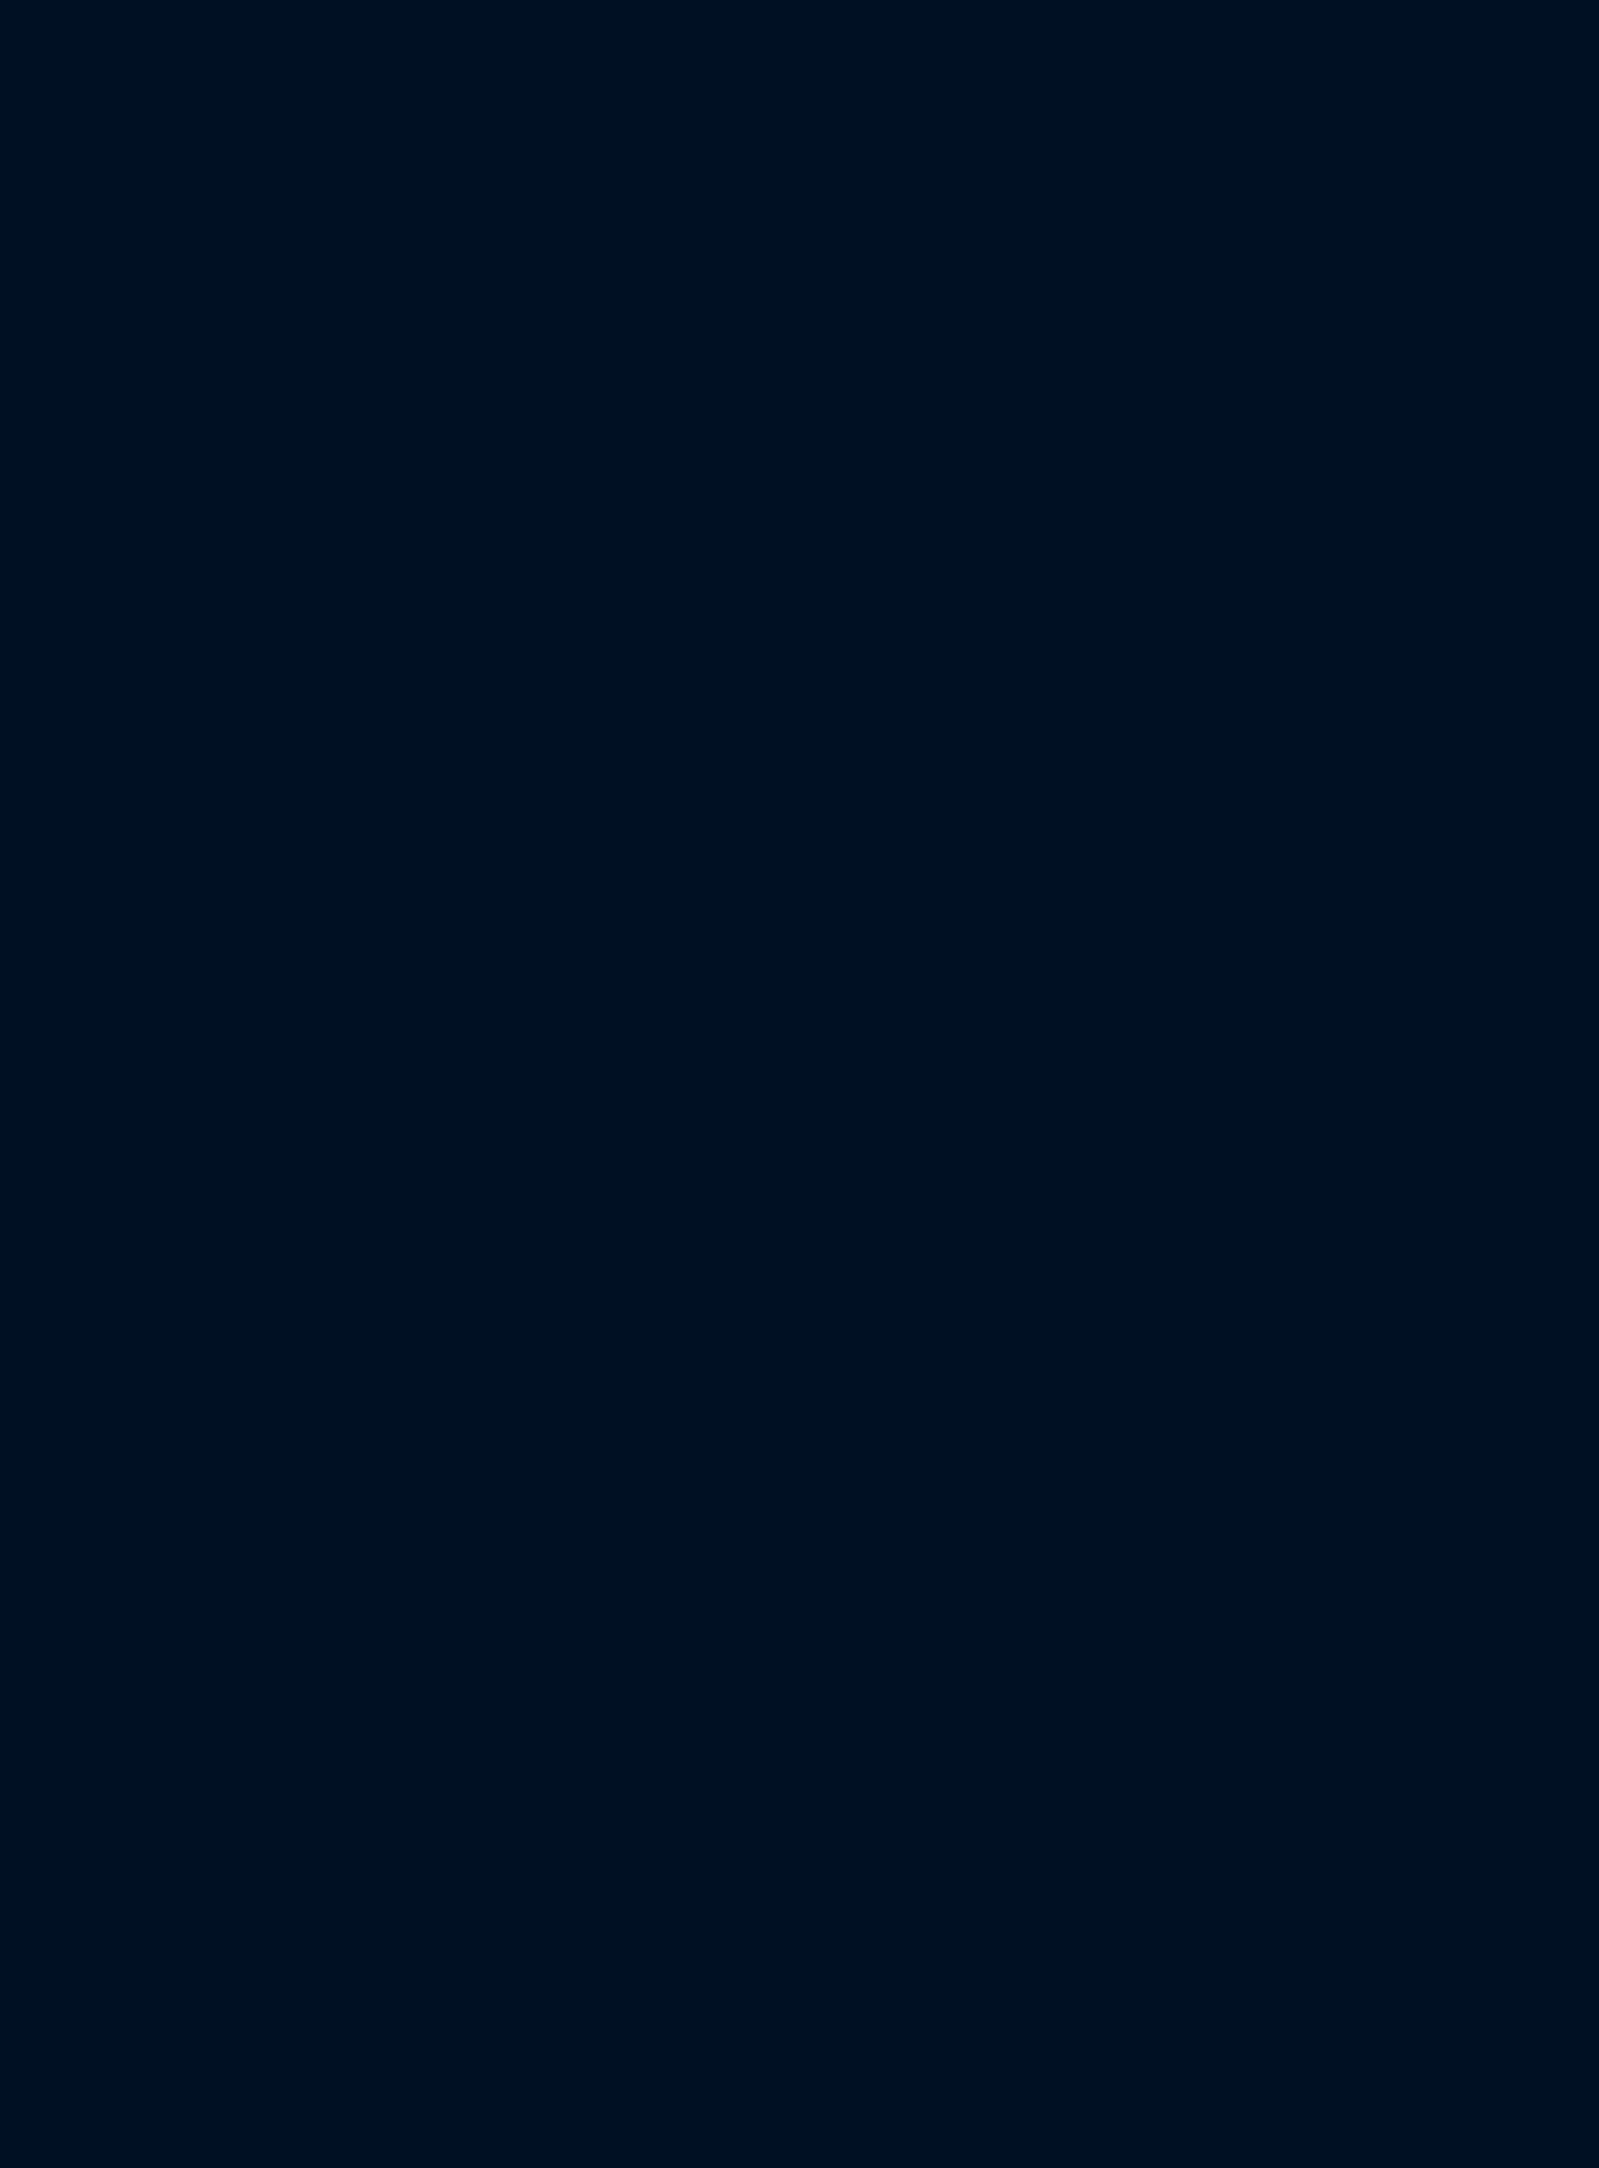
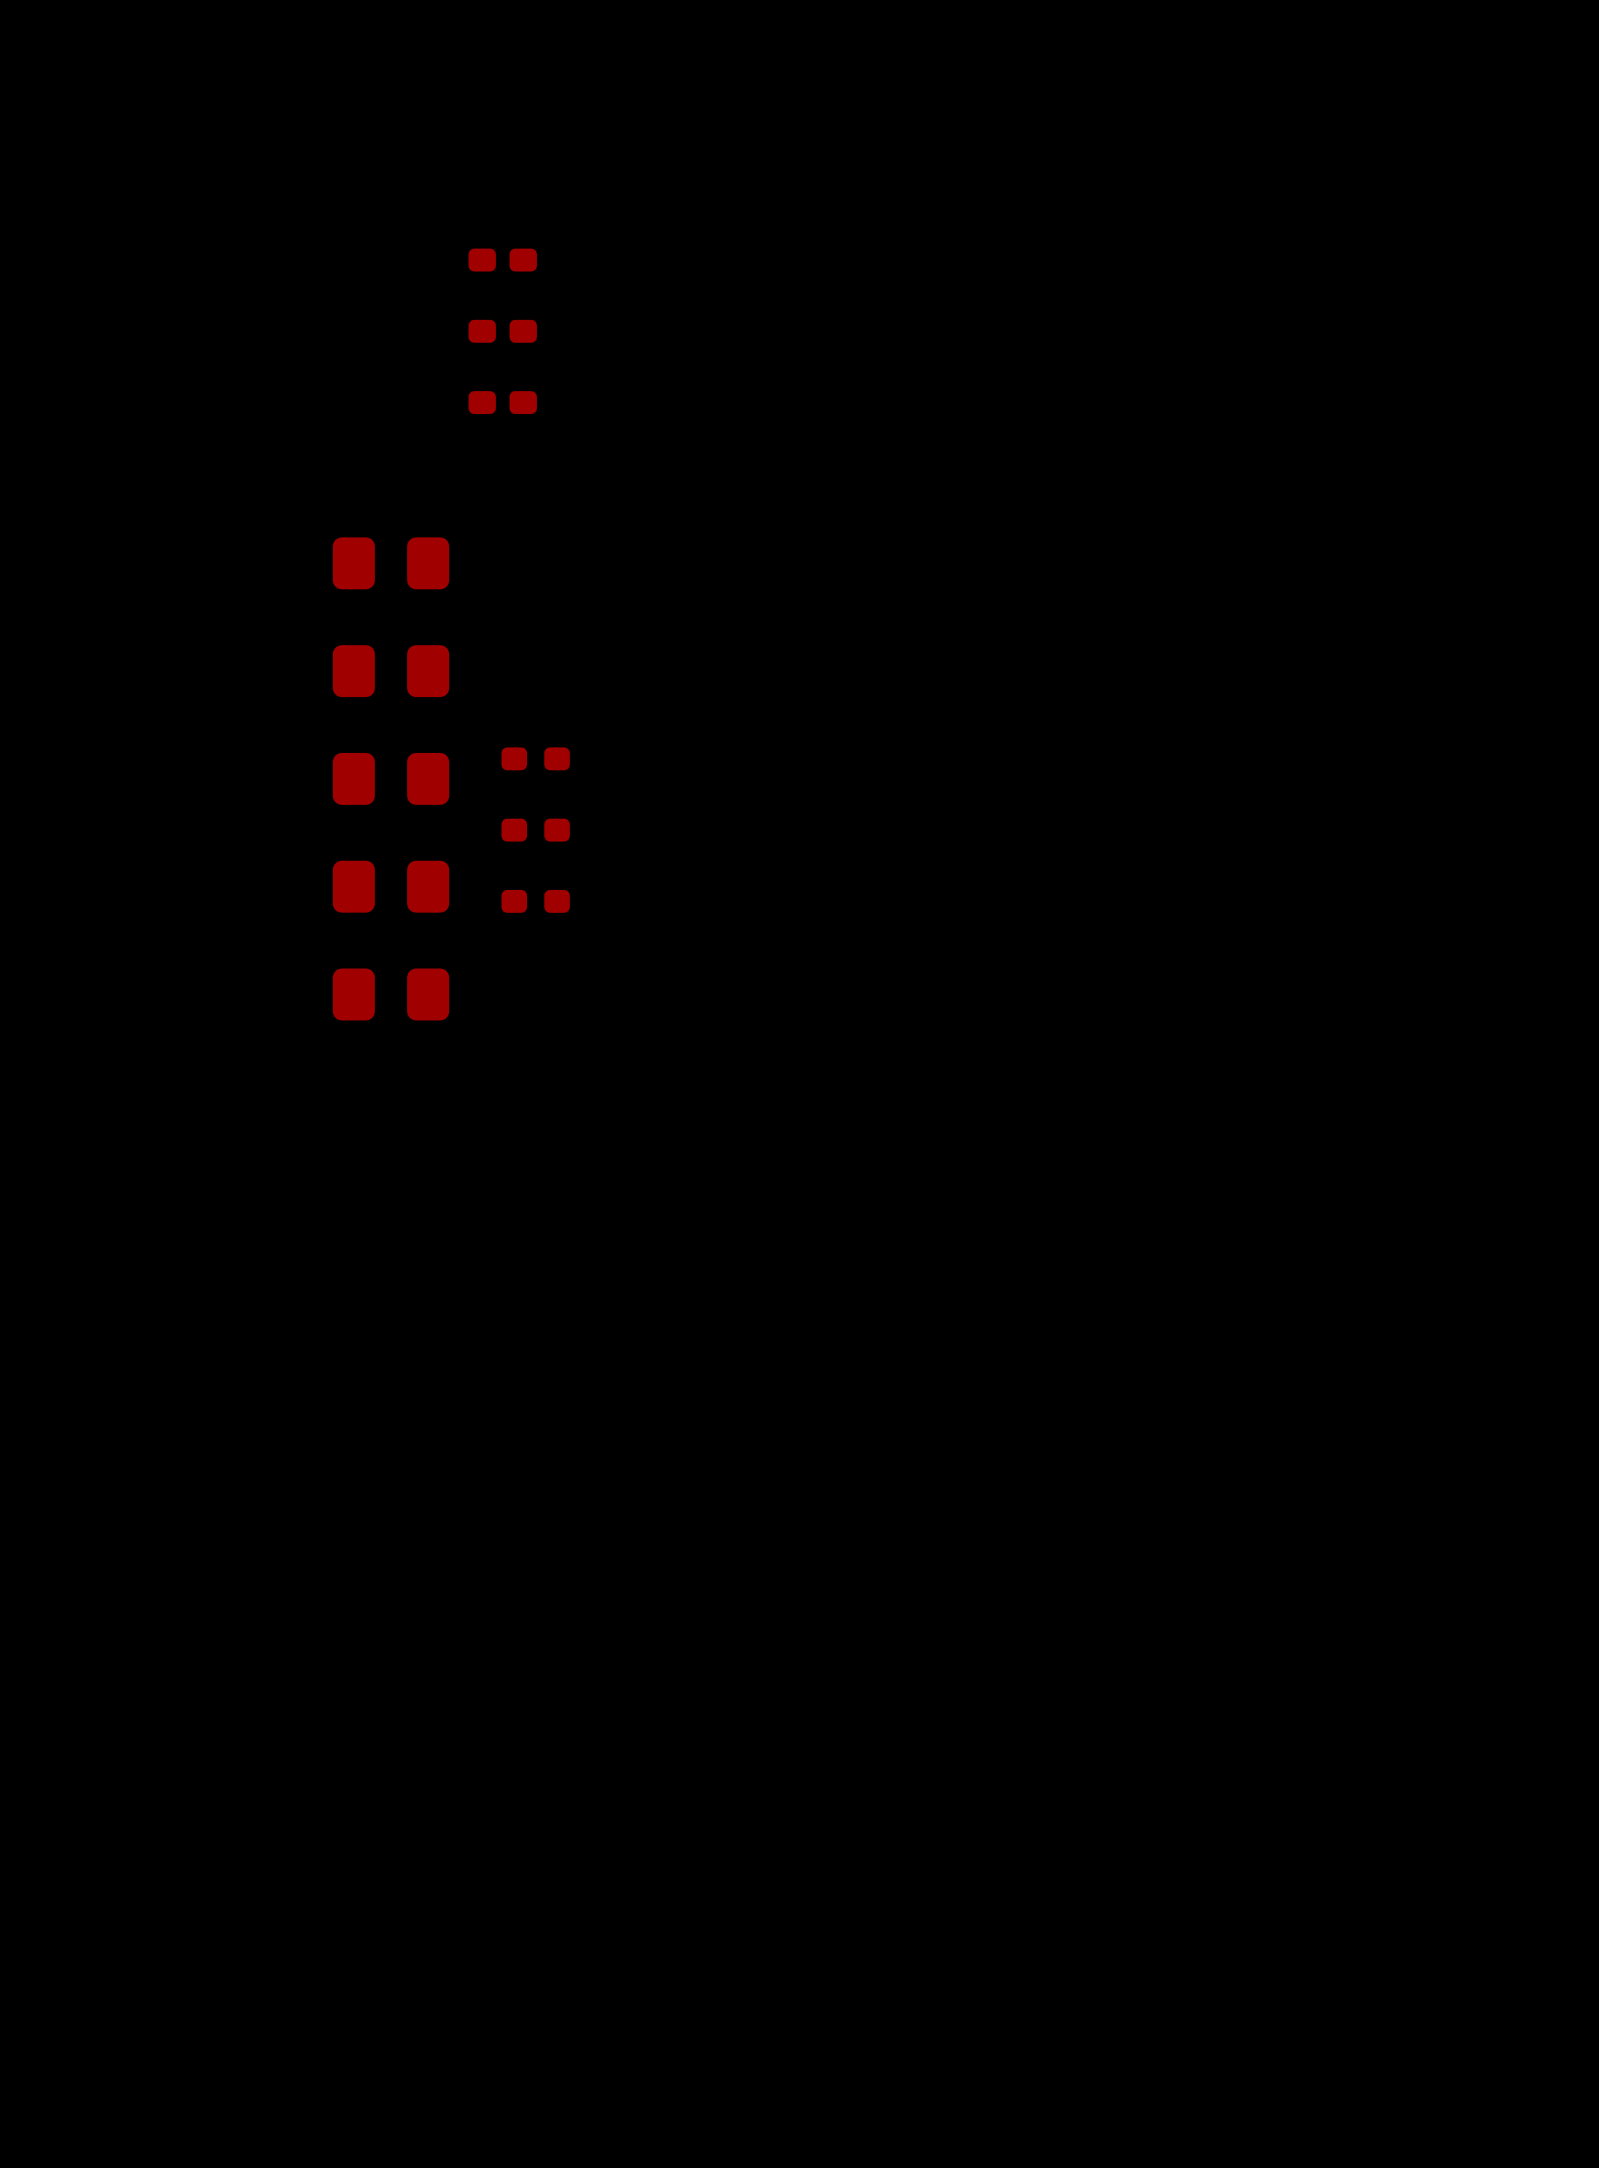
part: none -> (502, 260)
part: none -> (502, 331)
part: none -> (502, 402)
part: none -> (391, 563)
part: none -> (391, 671)
part: none -> (535, 758)
part: none -> (391, 778)
part: none -> (535, 830)
part: none -> (391, 886)
part: none -> (535, 901)
part: none -> (391, 994)

